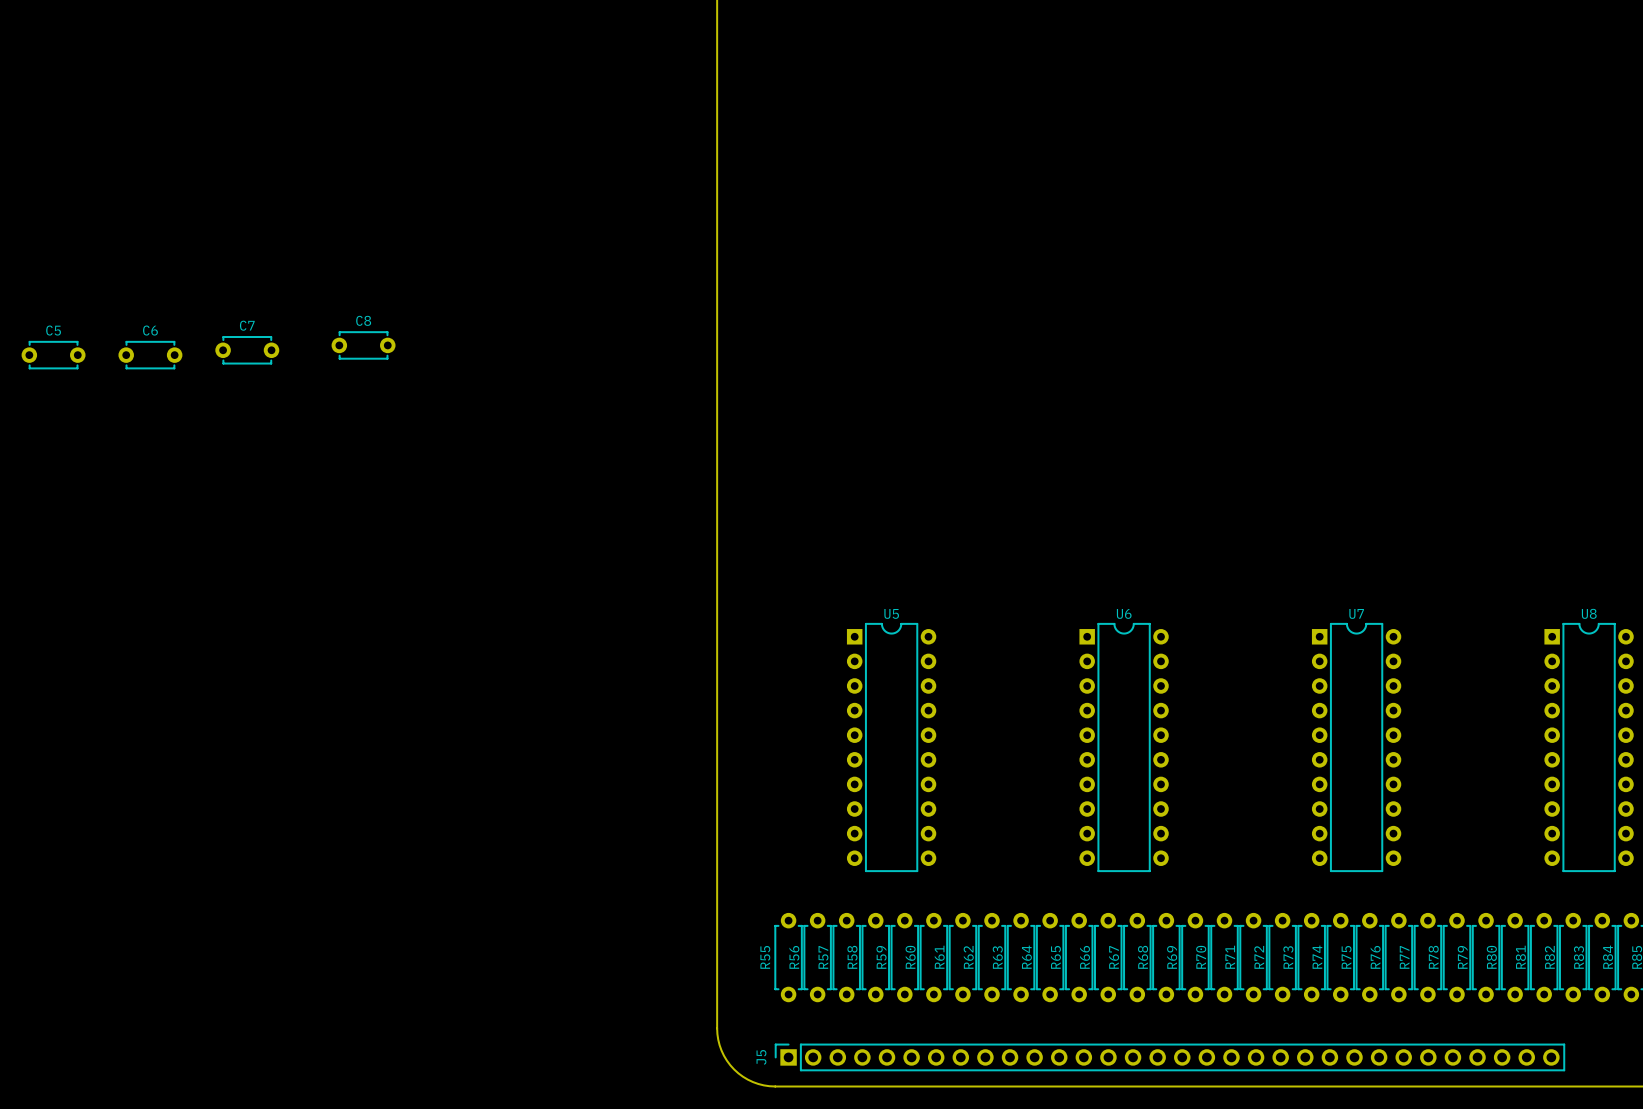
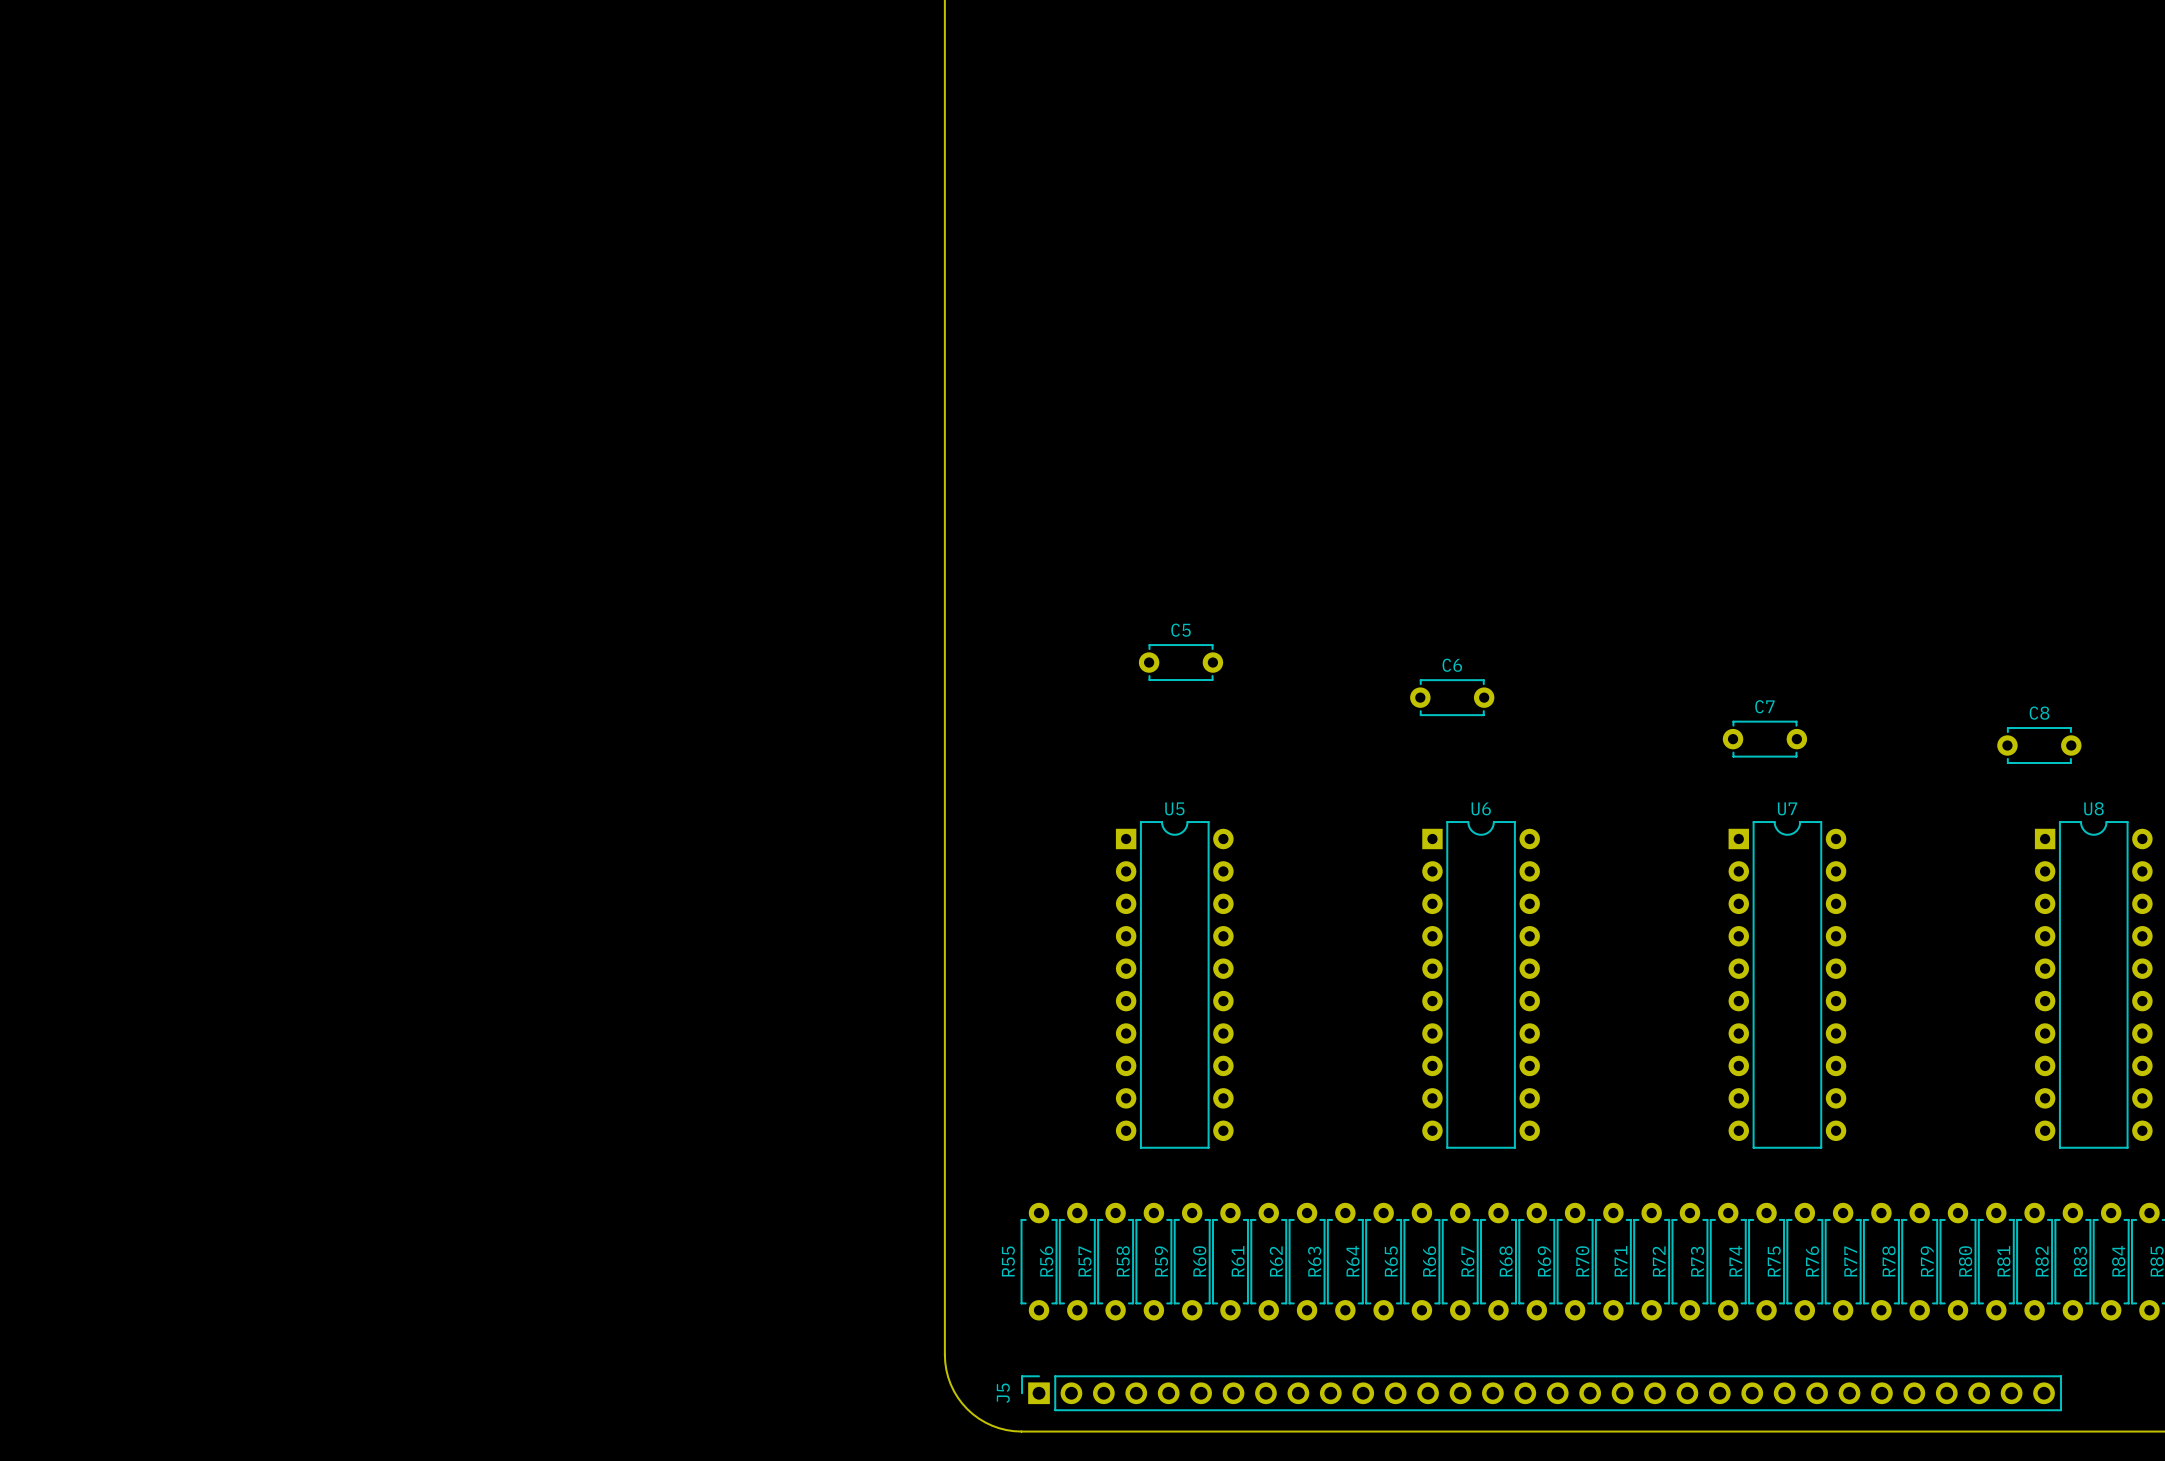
C8 position: (363, 345) -> (2039, 745)
C7 position: (247, 350) -> (1764, 739)
C5 position: (53, 355) -> (1181, 662)
C6 position: (150, 355) -> (1452, 697)

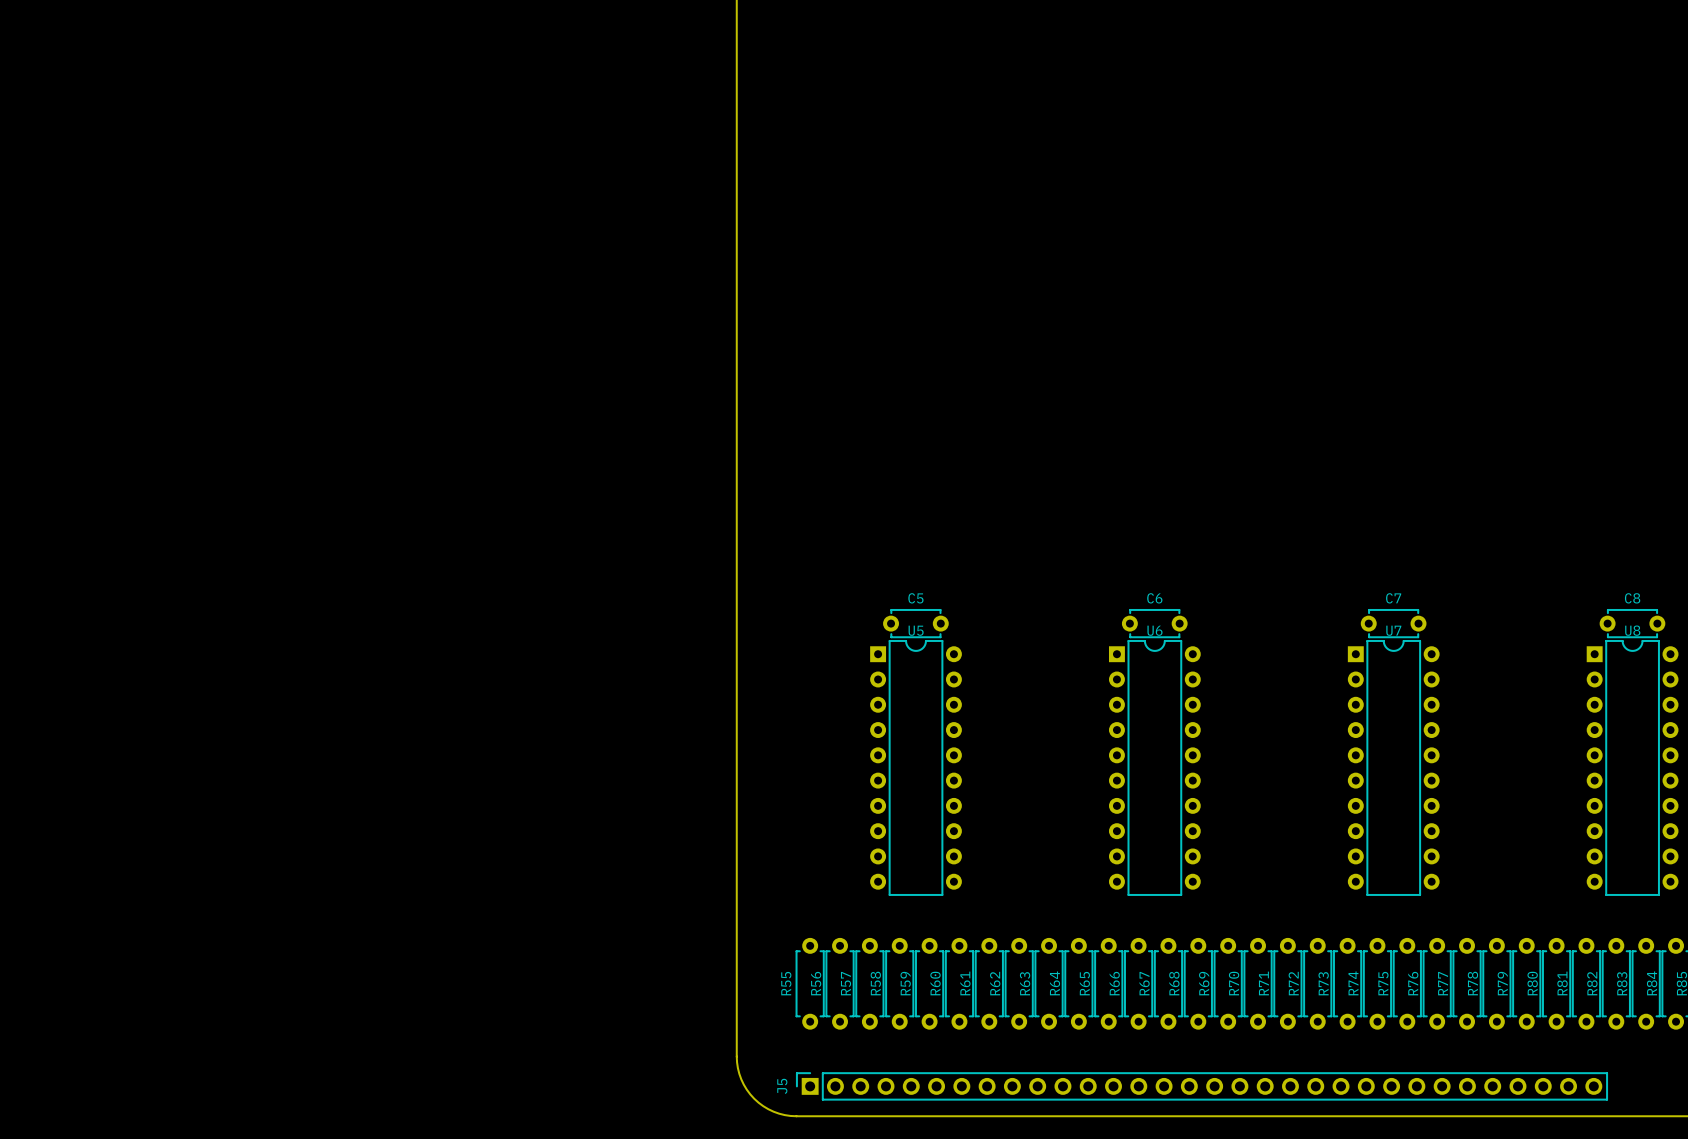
C5 position: (1181, 662) -> (915, 623)
C6 position: (1452, 697) -> (1154, 623)
C7 position: (1764, 739) -> (1393, 623)
C8 position: (2039, 745) -> (1632, 623)

